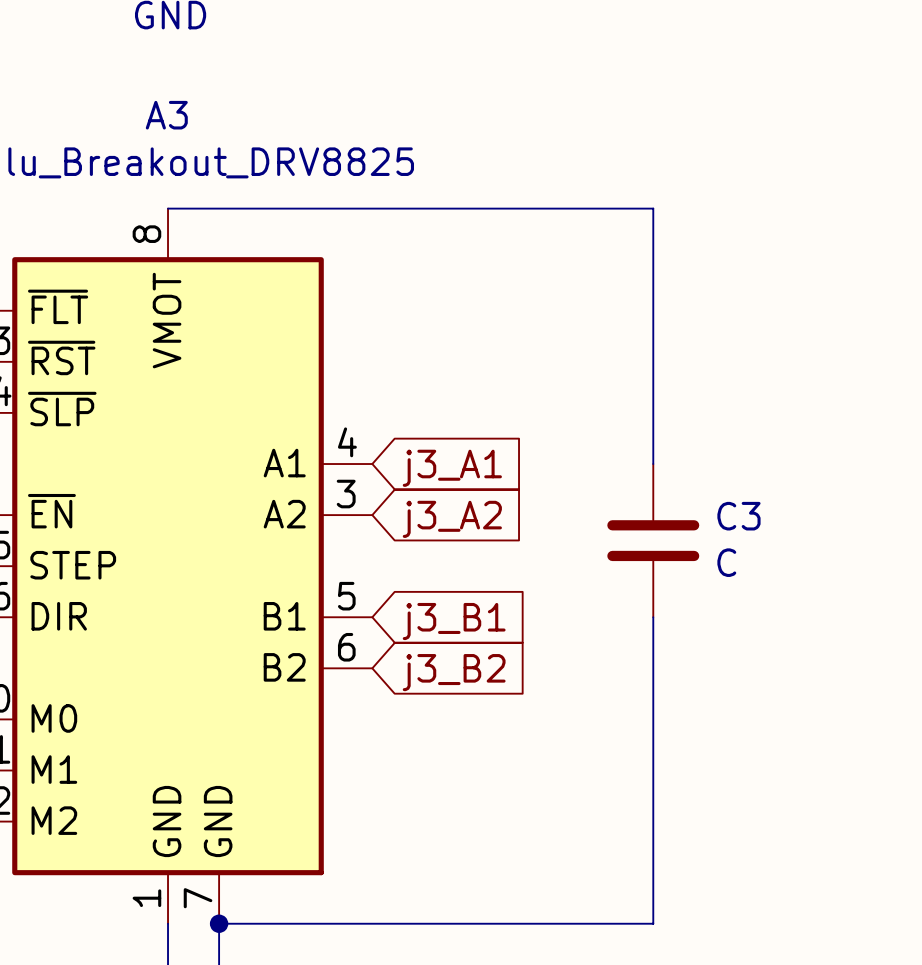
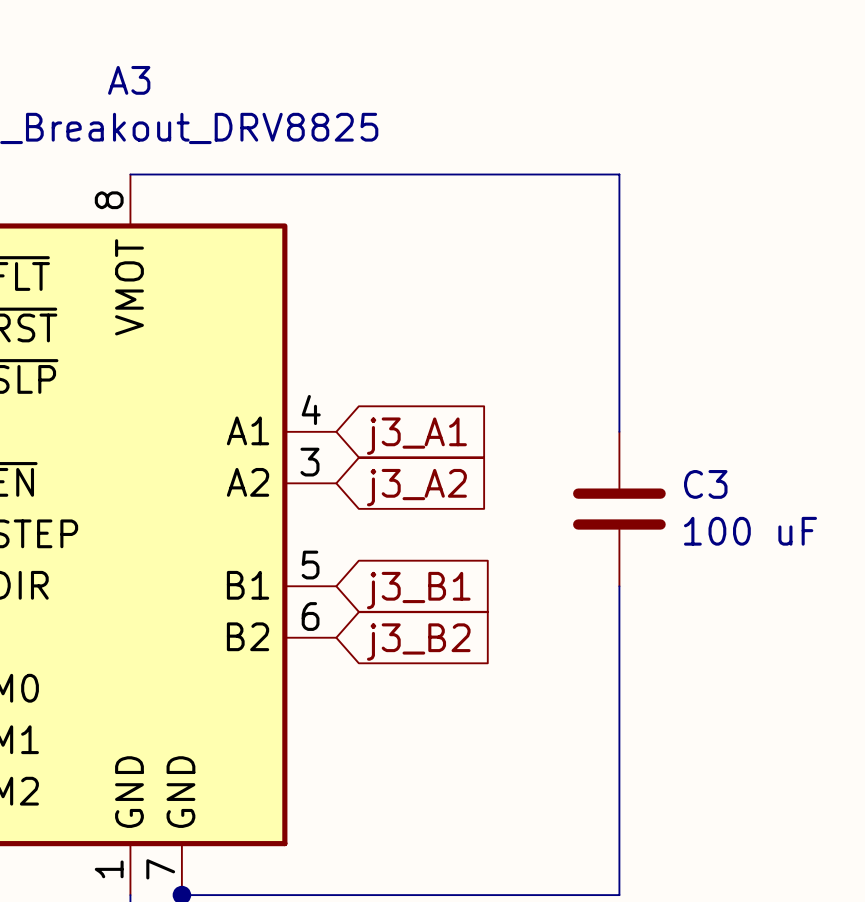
C3 value: C (726, 562) -> 100 uF (750, 531)

